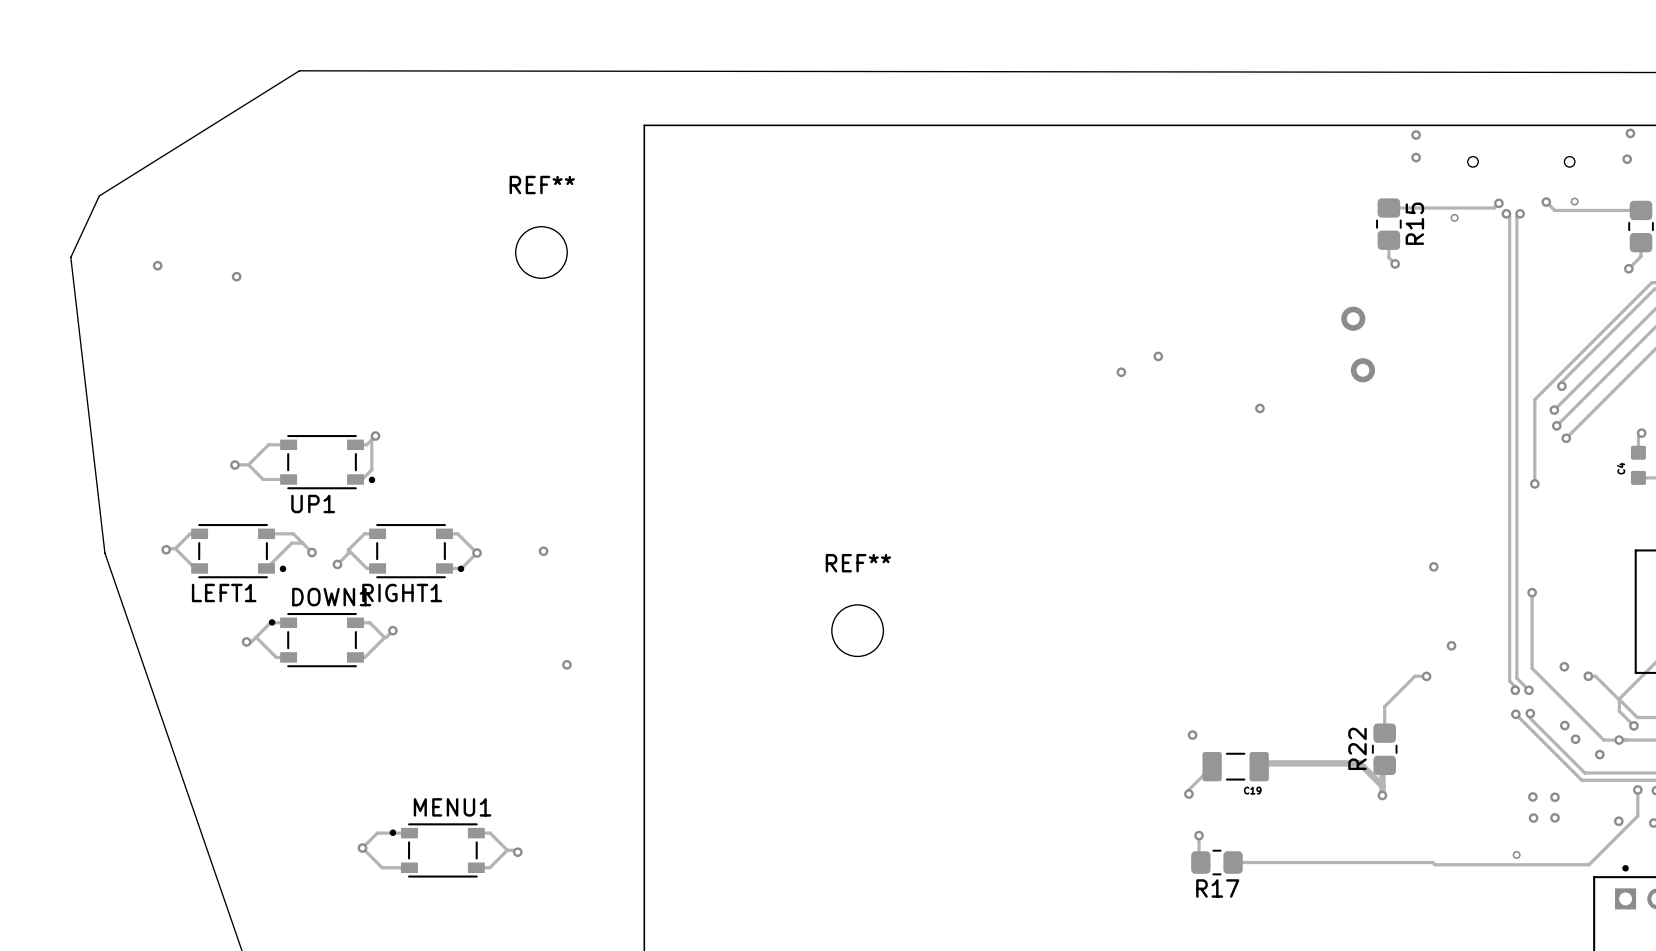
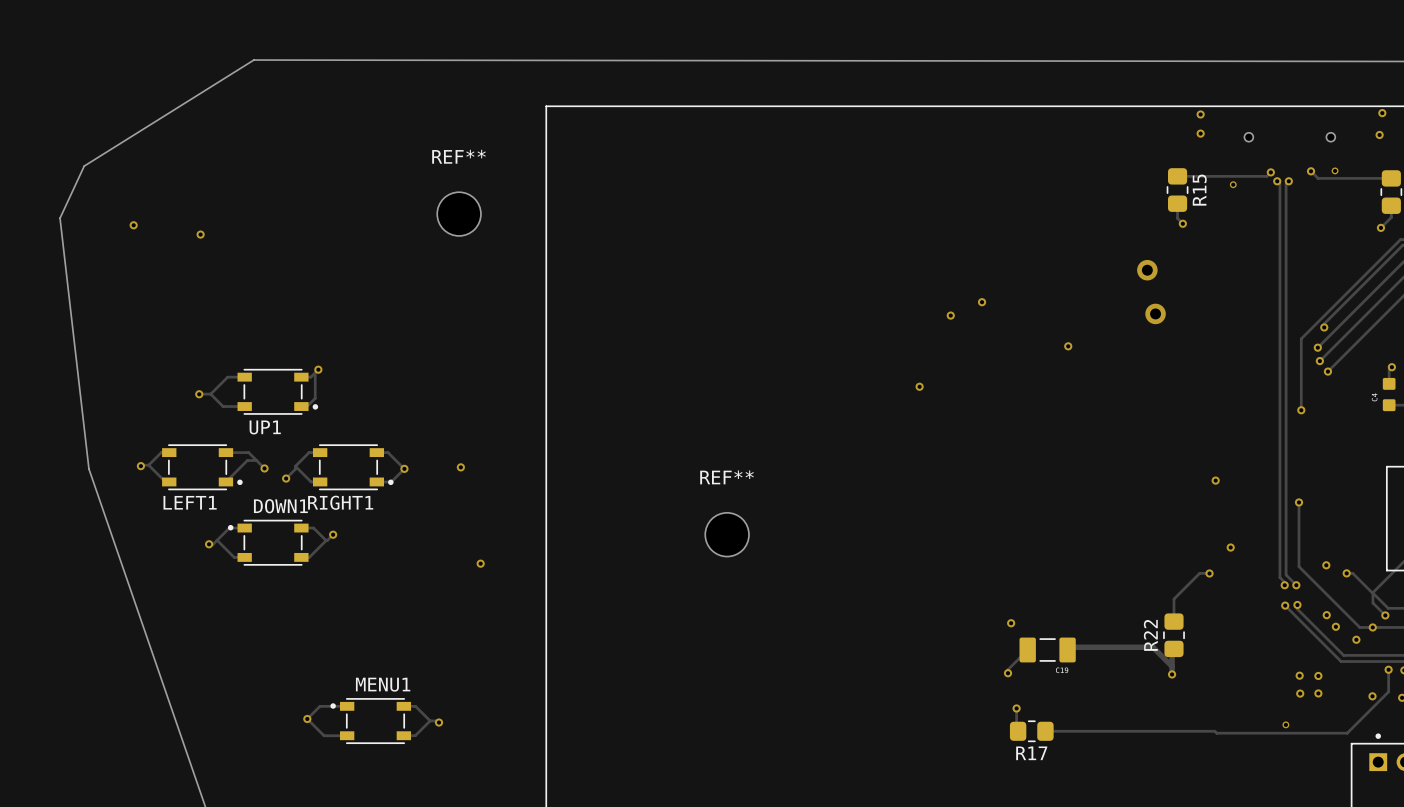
via: none -> (919, 386)

